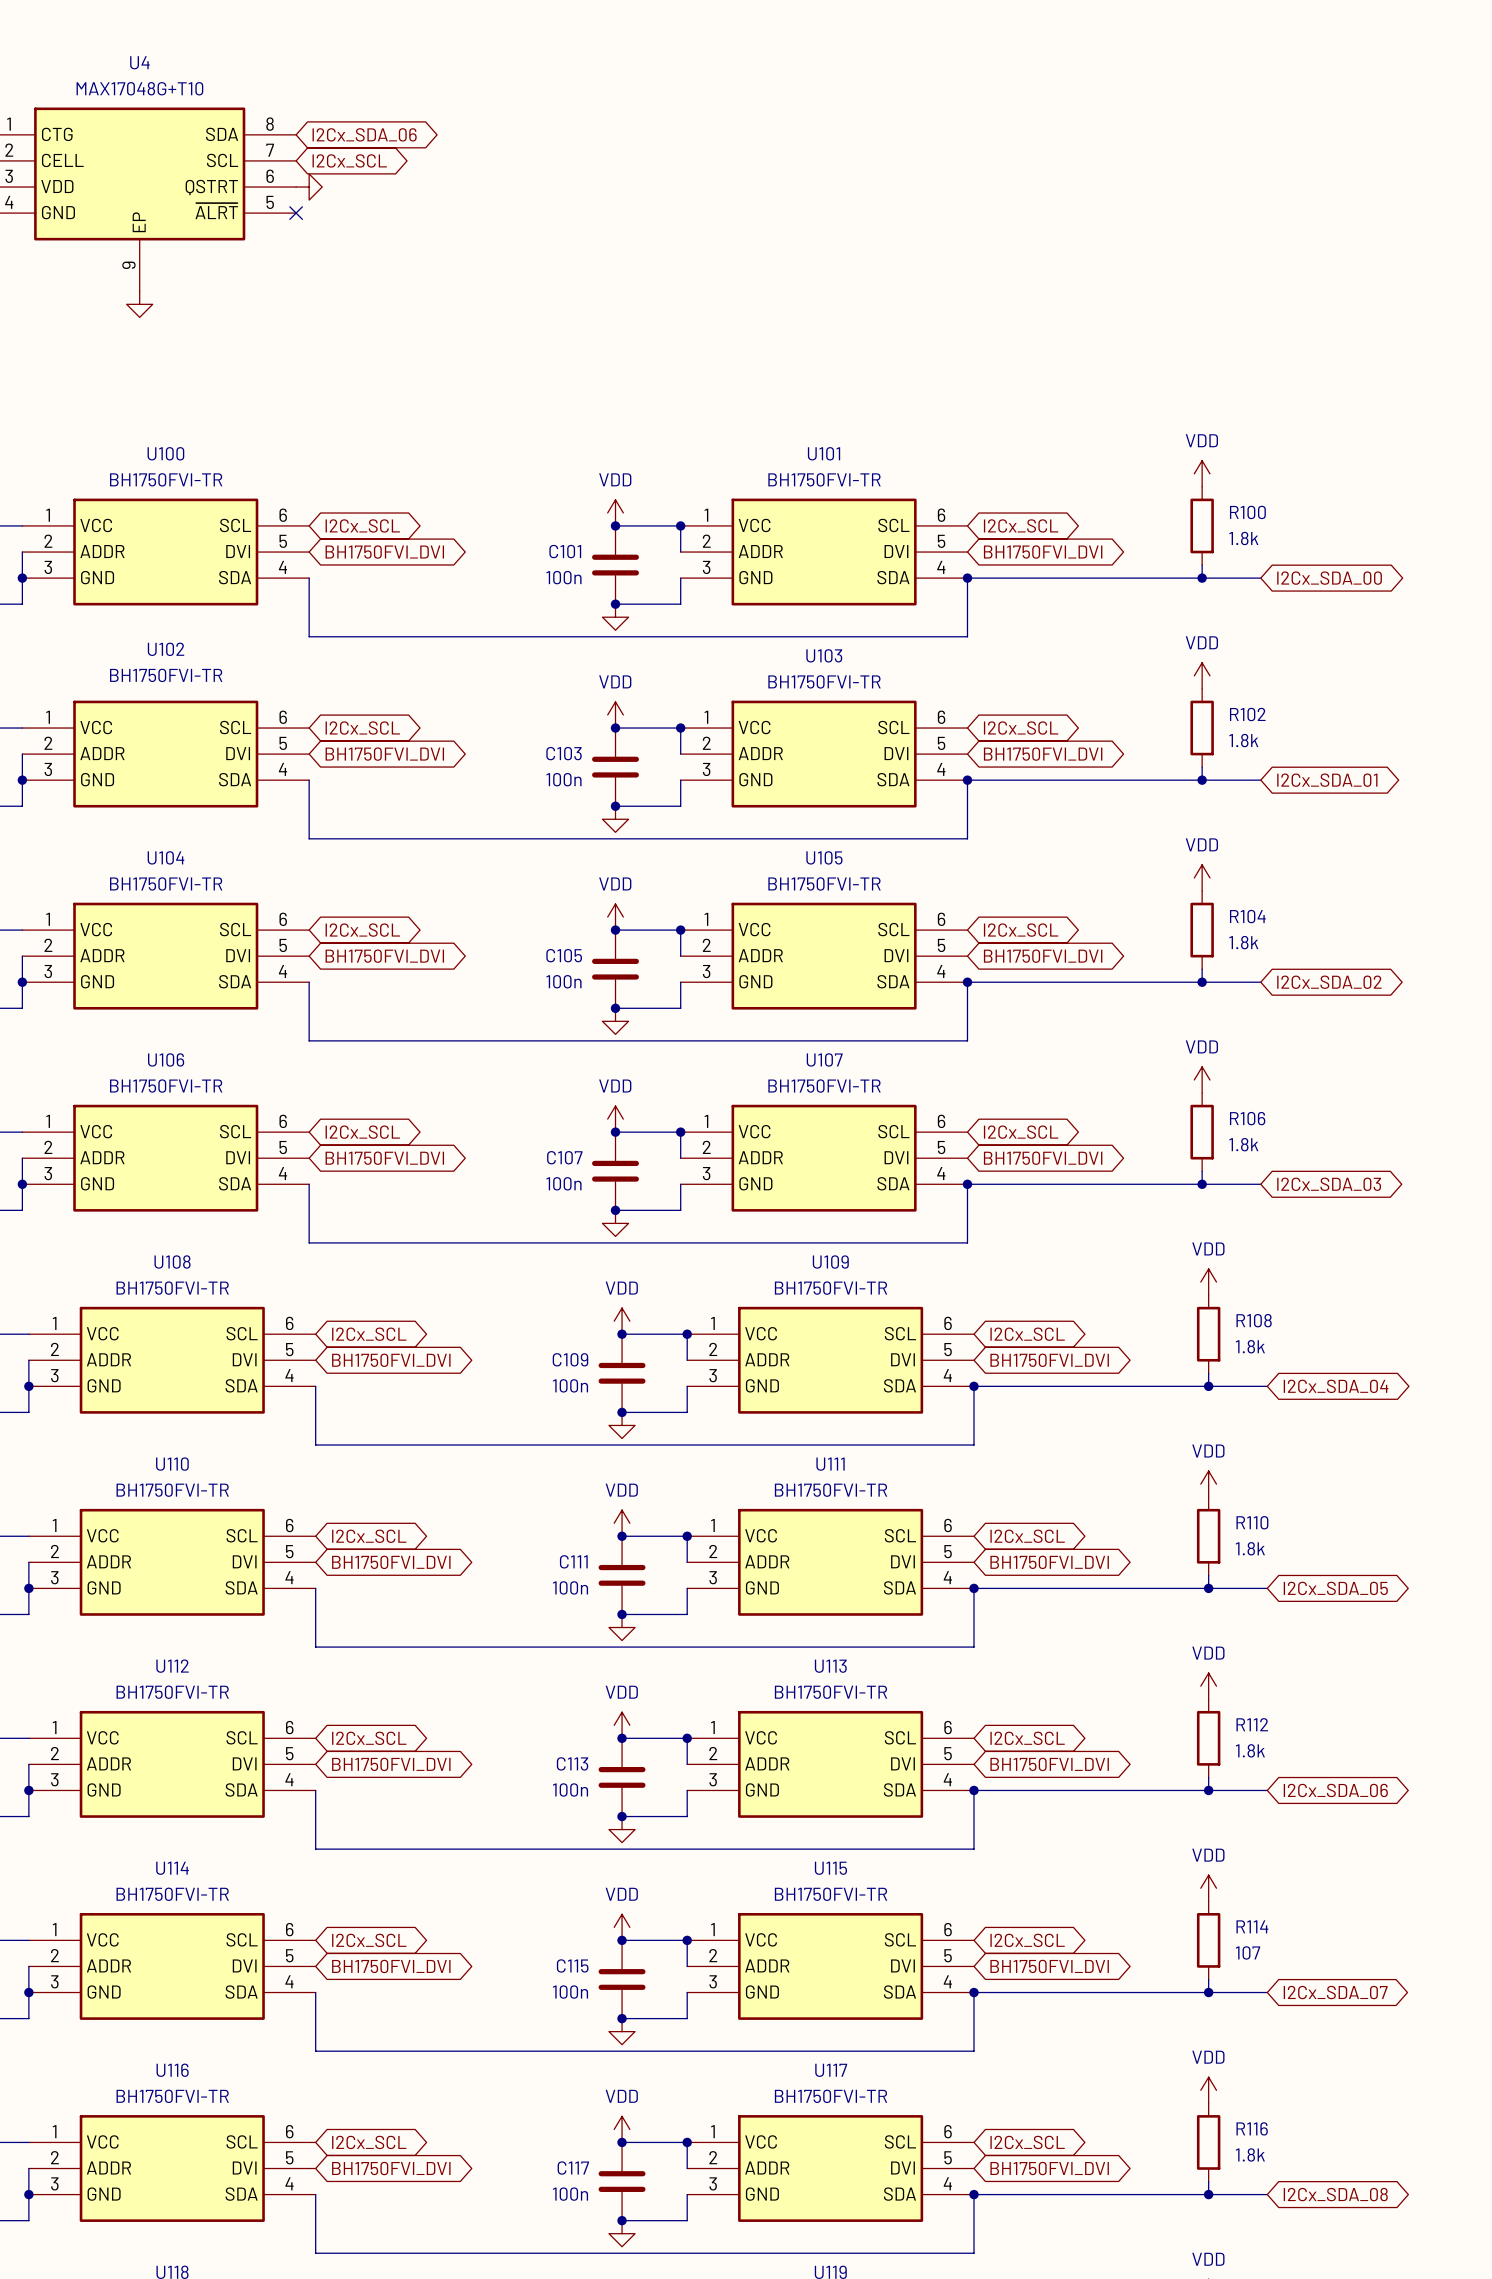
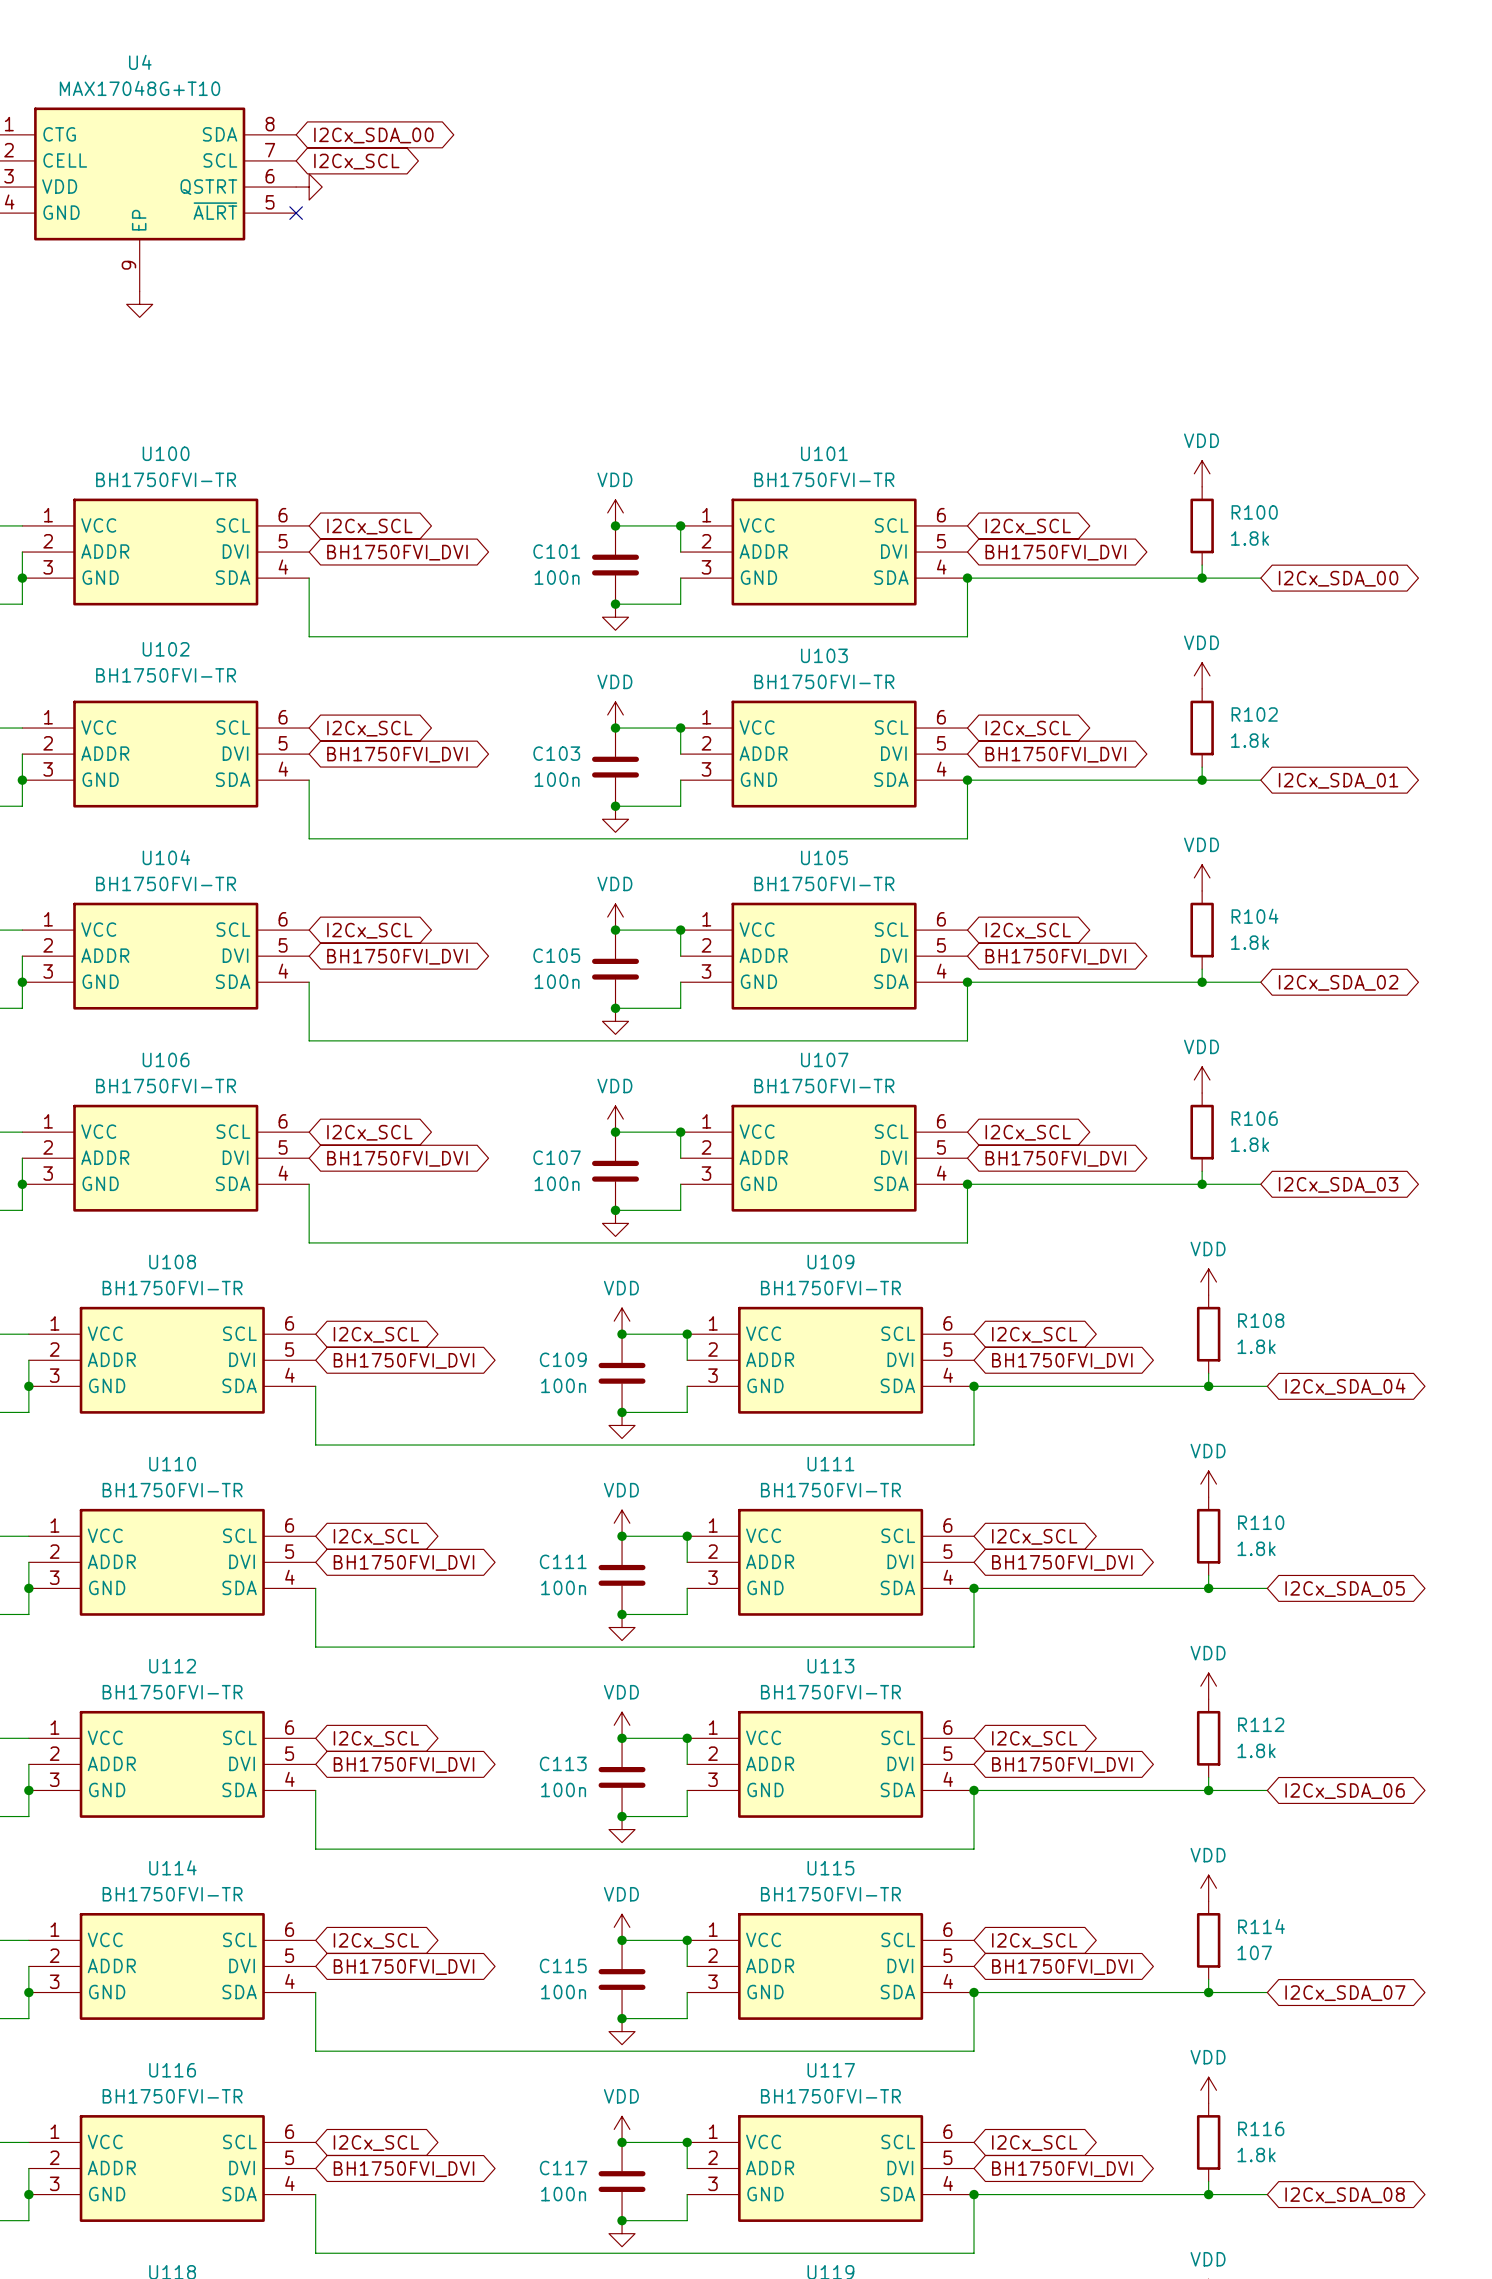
global label: I2Cx_SDA_06 (364, 134) -> I2Cx_SDA_00 (373, 135)

